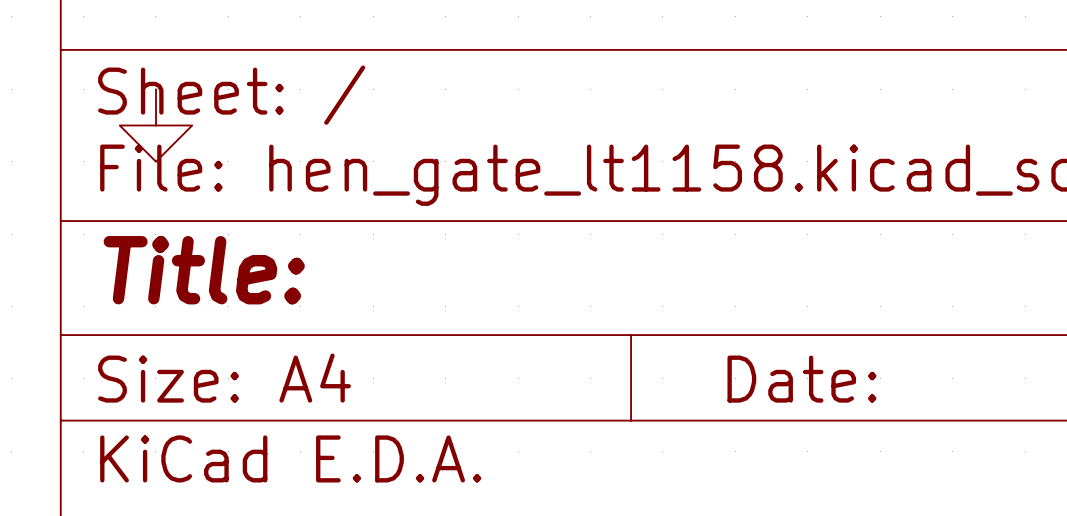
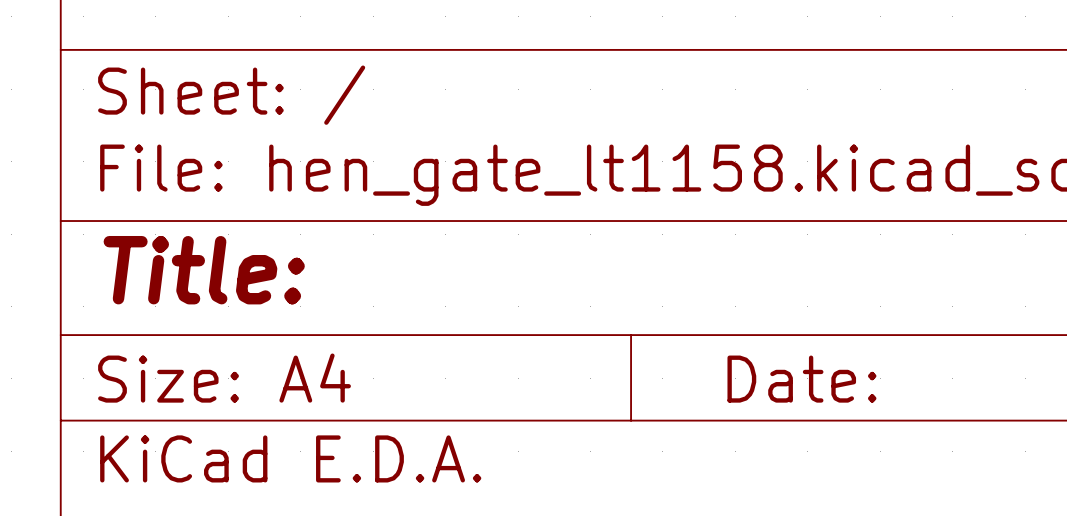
power symbol: (155, 125) -> none

